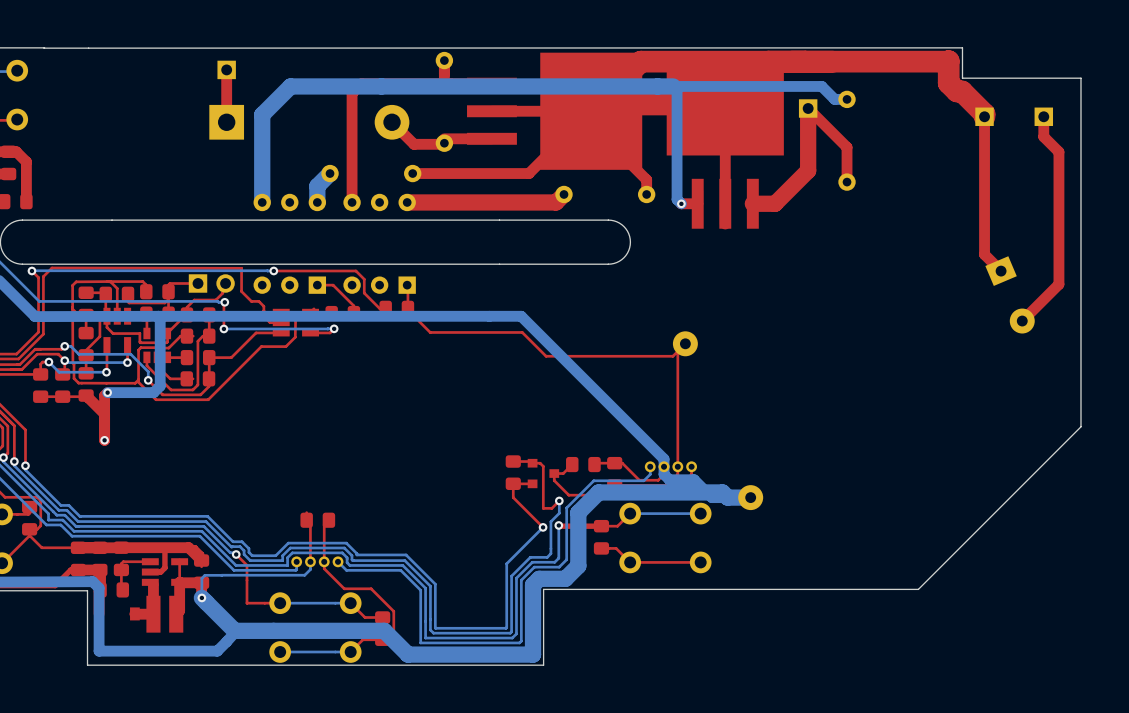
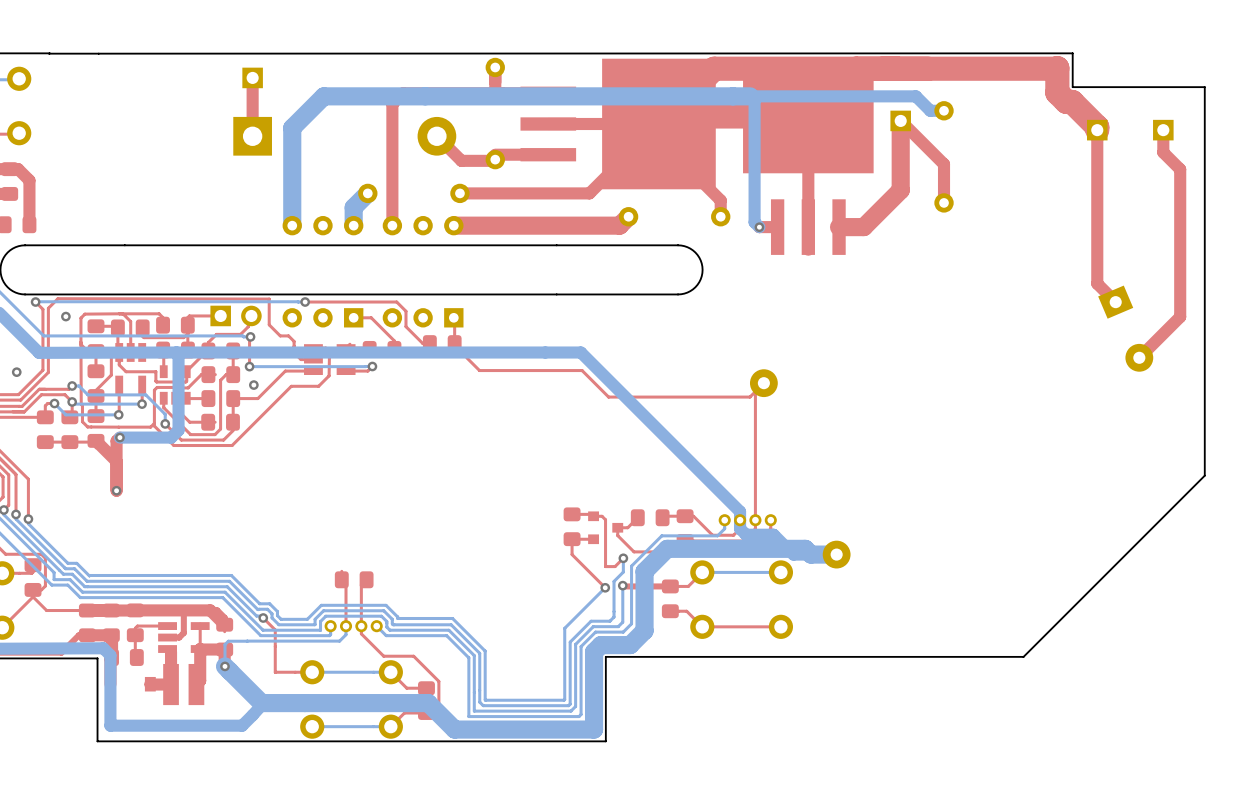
via: none -> (65, 316)
via: none -> (16, 372)
via: none -> (253, 385)

